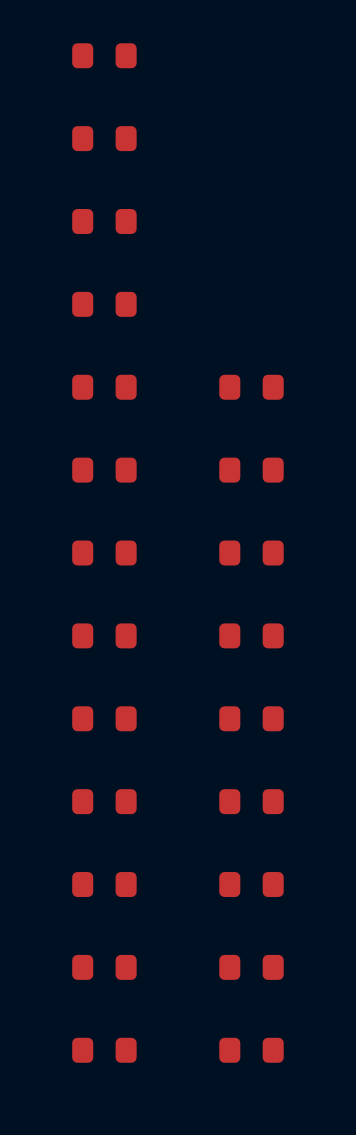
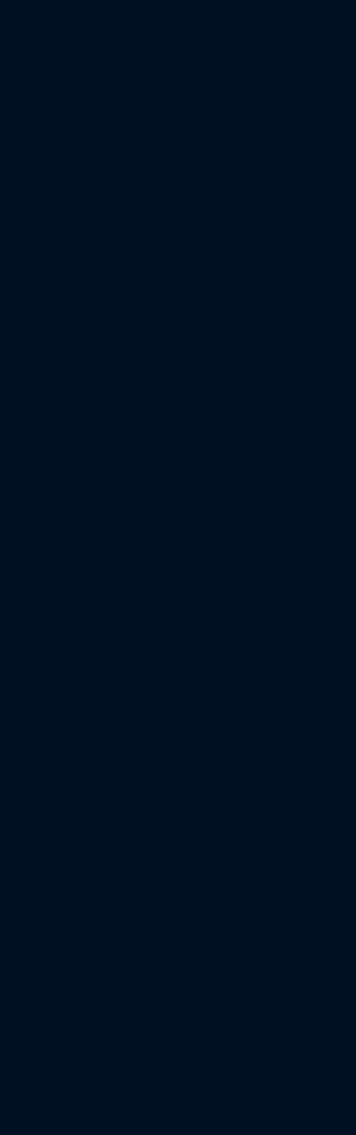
part: (104, 55) -> none
part: (104, 138) -> none
part: (104, 221) -> none
part: (104, 304) -> none
part: (104, 387) -> none
part: (251, 387) -> none
part: (104, 470) -> none
part: (251, 470) -> none
part: (104, 553) -> none
part: (251, 553) -> none
part: (104, 635) -> none
part: (251, 635) -> none
part: (104, 718) -> none
part: (251, 718) -> none
part: (104, 801) -> none
part: (251, 801) -> none
part: (104, 884) -> none
part: (251, 884) -> none
part: (104, 967) -> none
part: (251, 967) -> none
part: (104, 1050) -> none
part: (251, 1050) -> none

